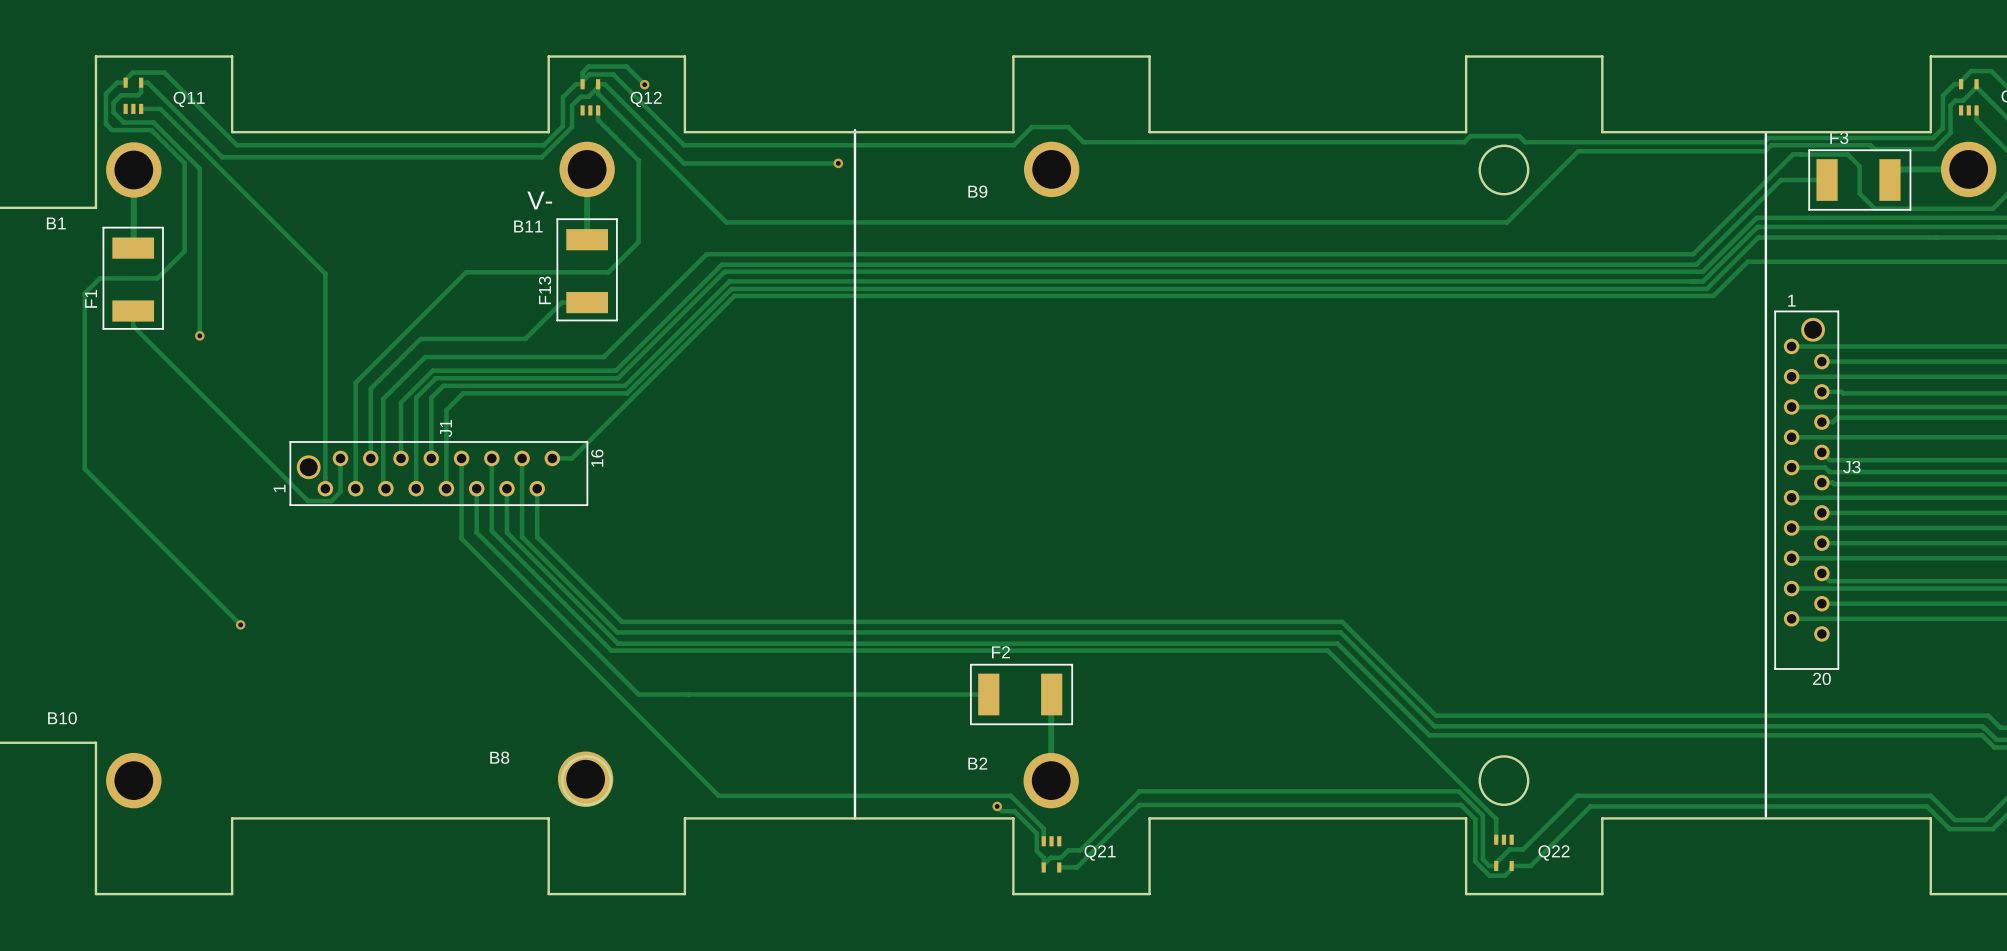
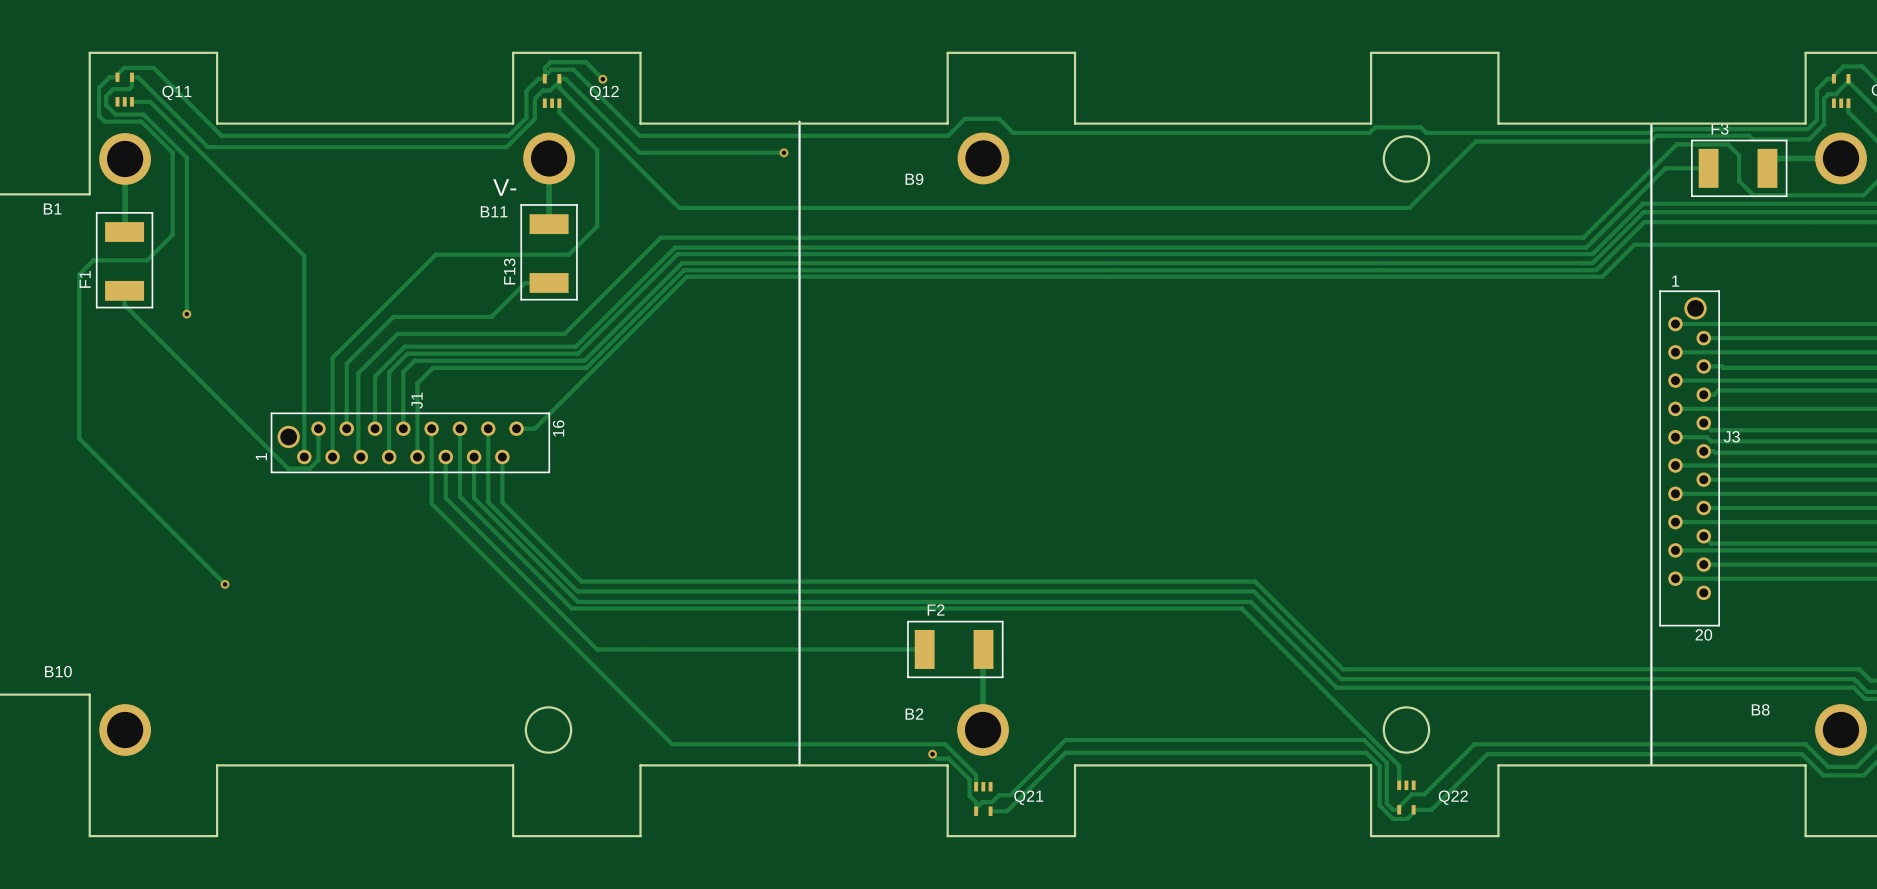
B8 position: (585, 779) -> (1840, 730)

